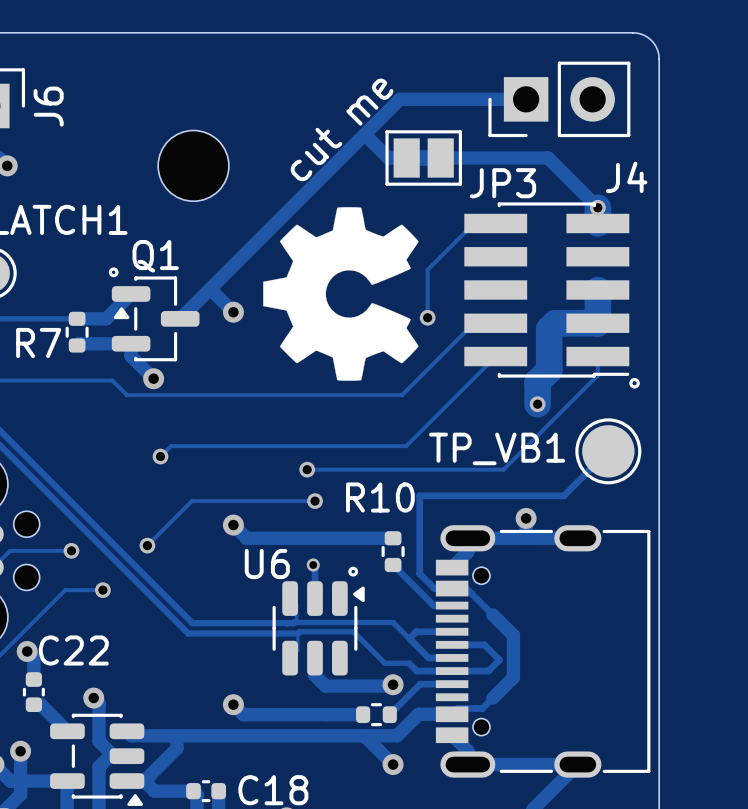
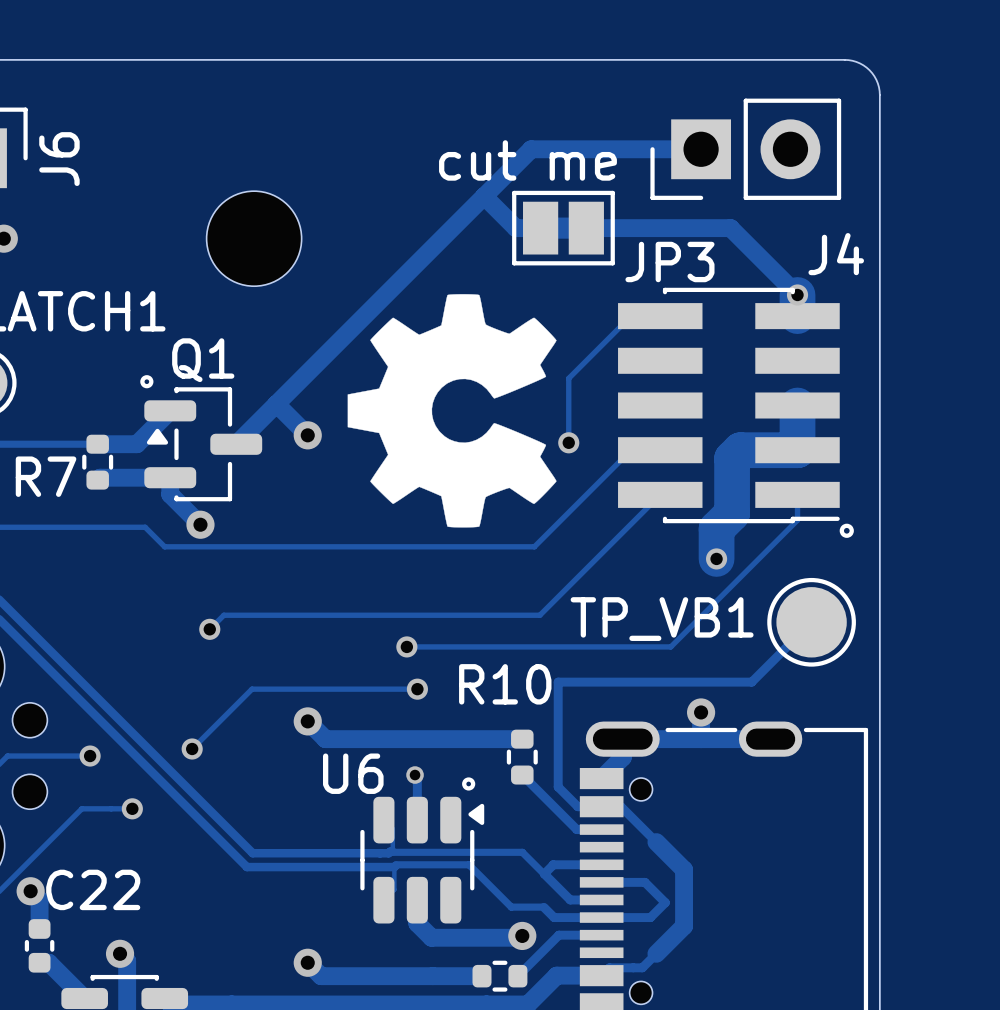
text rotation: 0° (342, 129) -> 45° clockwise (527, 160)

